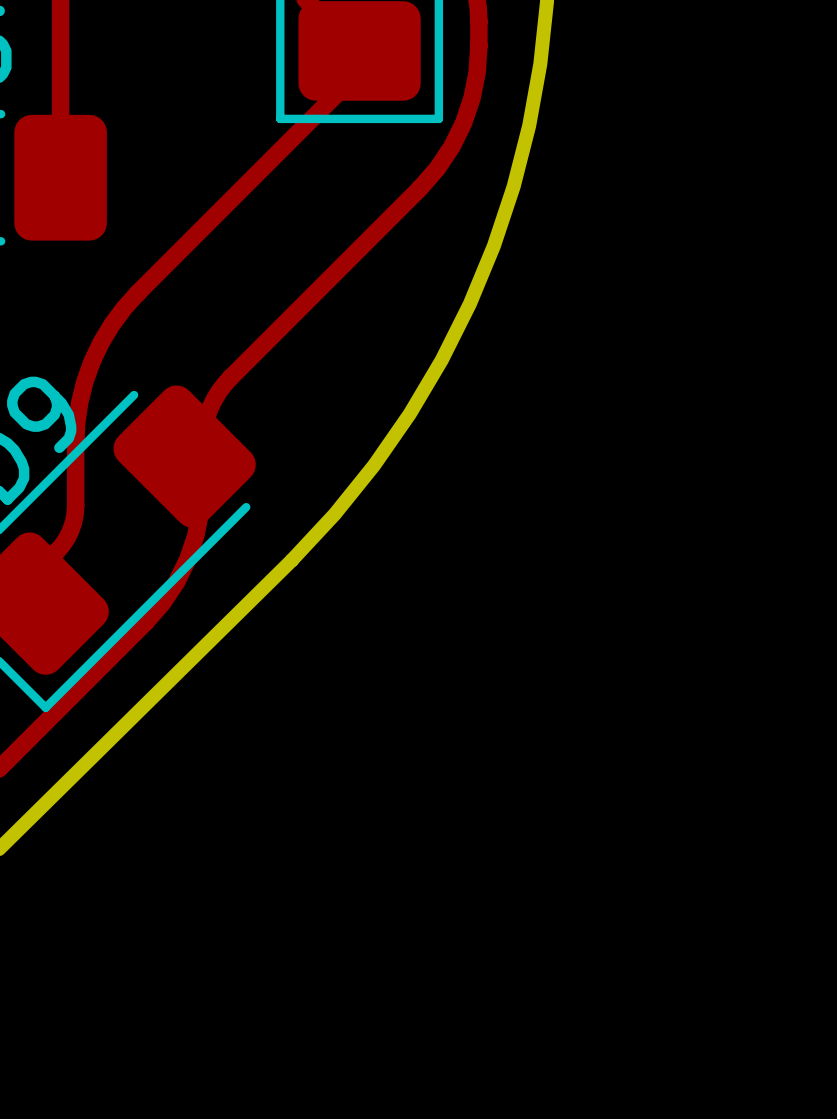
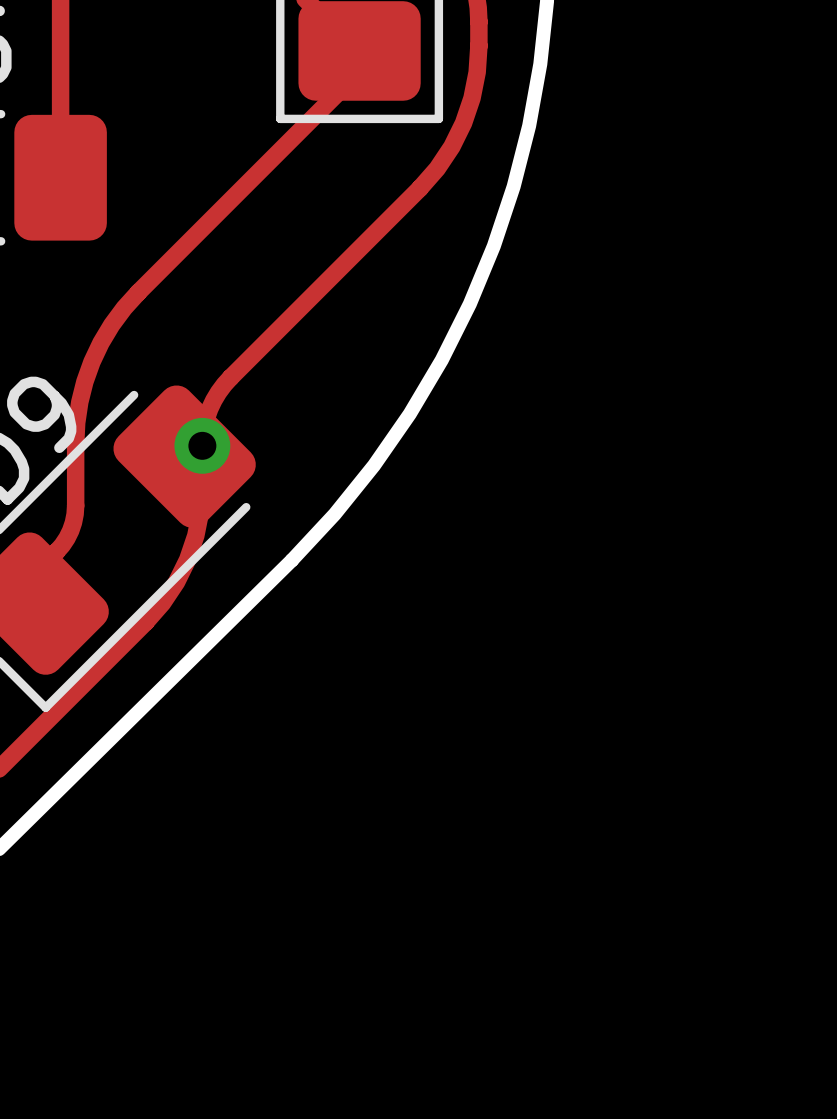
via: none -> (202, 445)

